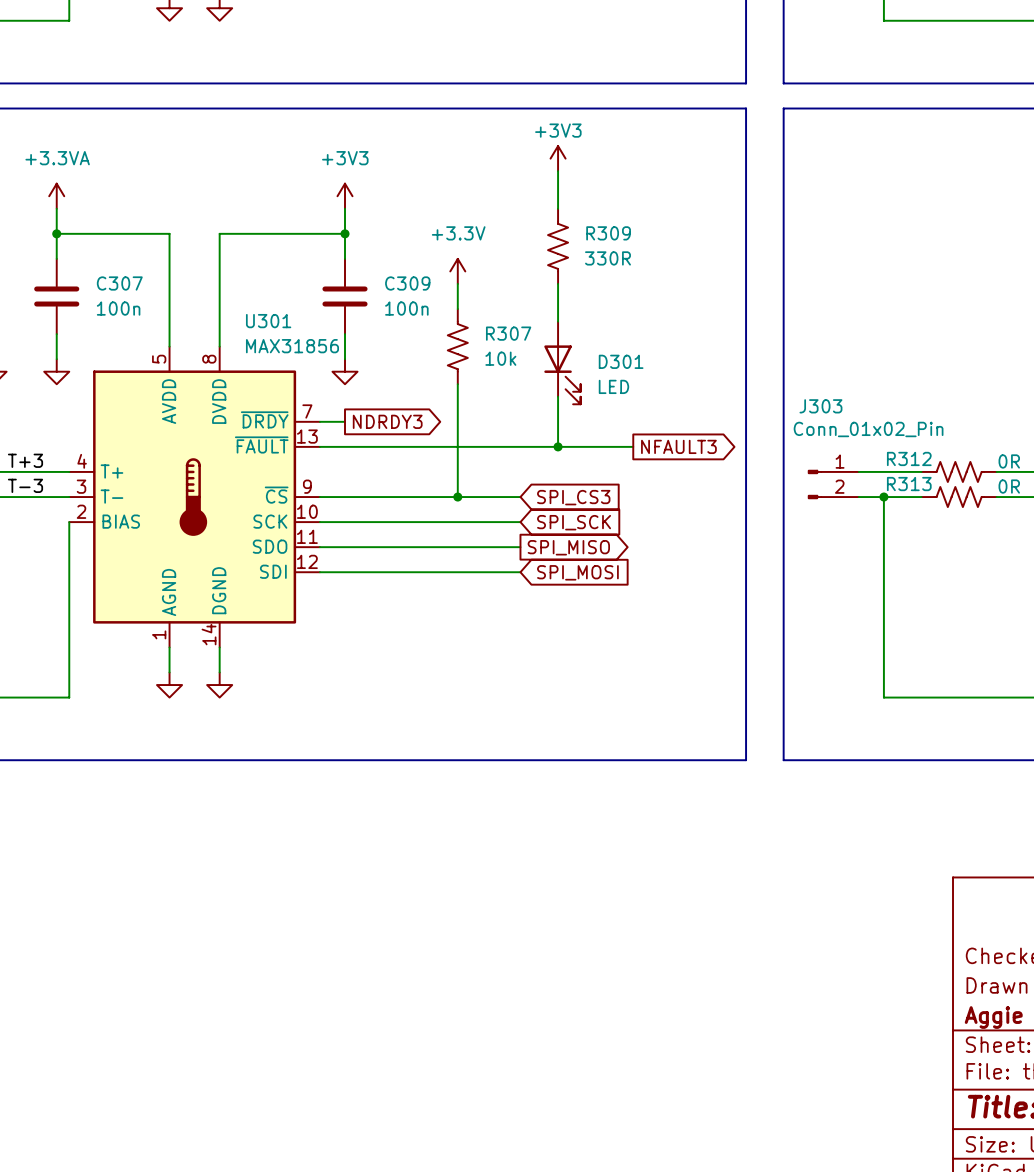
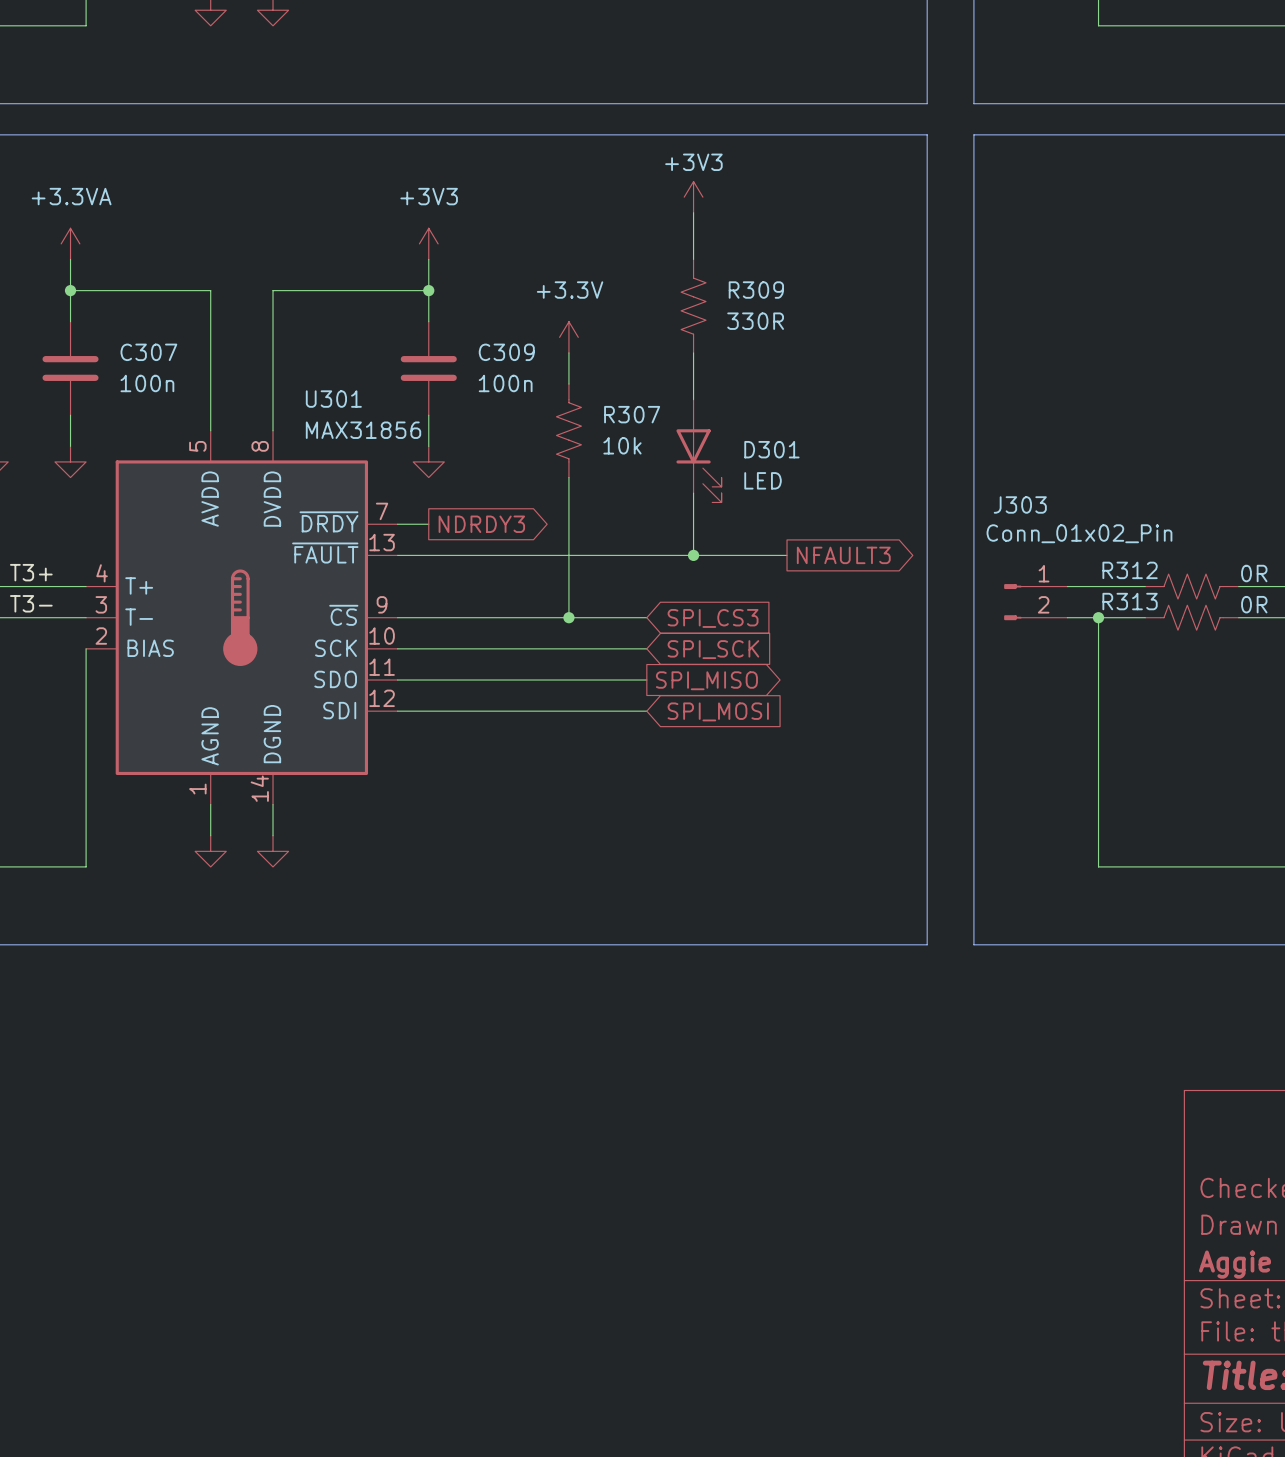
label: T+3 (25, 460) -> T3+ (31, 572)
label: T-3 (25, 485) -> T3- (31, 603)

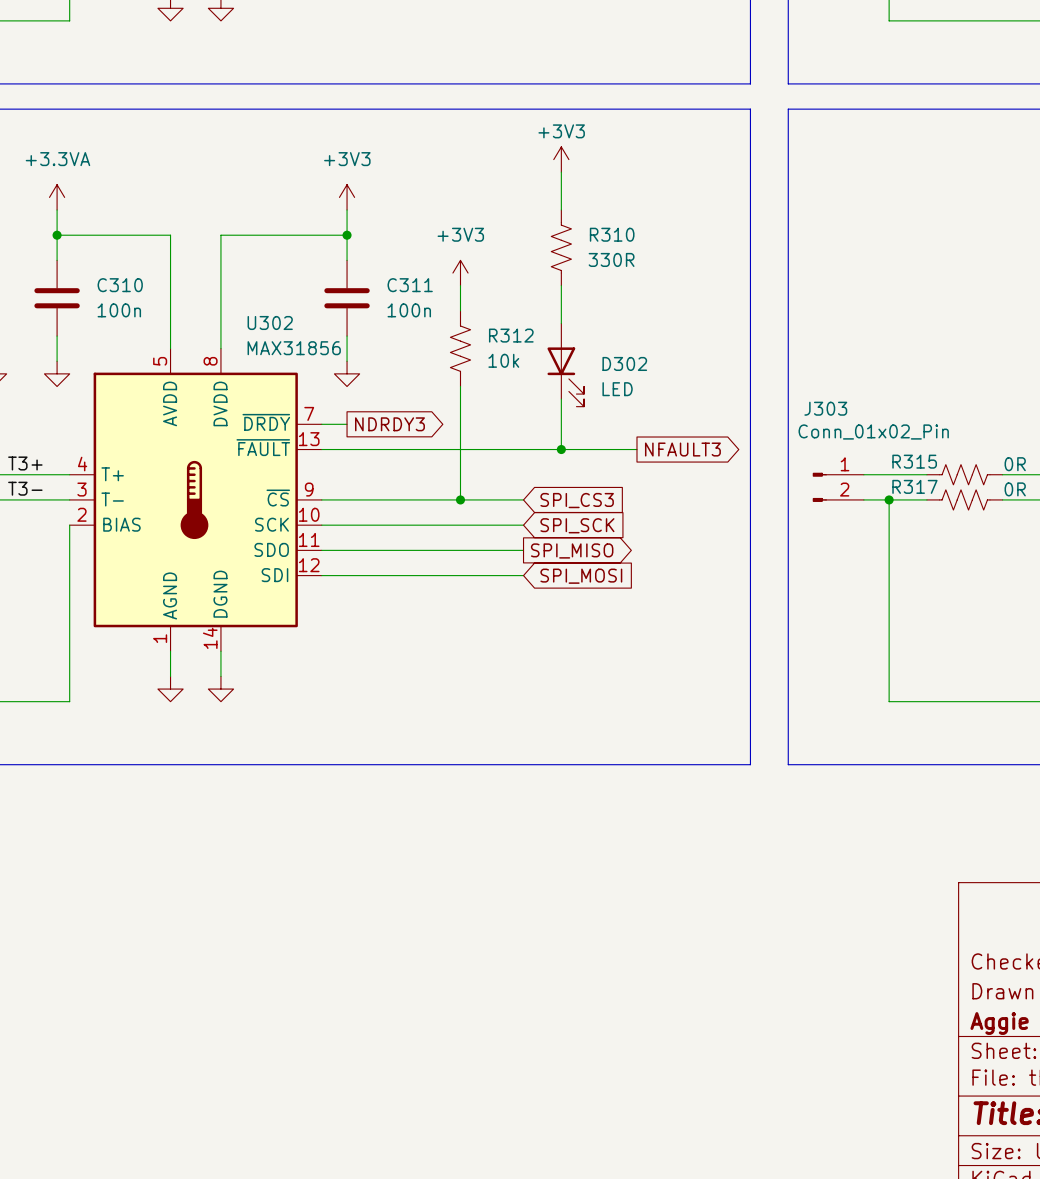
R309 name: R309 (756, 290) -> R310 (612, 234)
power symbol: +3.3V (568, 337) -> +3V3 (460, 273)
C307 name: C307 (148, 352) -> C310 (120, 285)
C309 name: C309 (506, 352) -> C311 (410, 285)
U301 name: U301 (333, 399) -> U302 (270, 322)
R307 name: R307 (632, 414) -> R312 (511, 335)
D301 name: D301 (771, 449) -> D302 (624, 363)
R312 name: R312 (1130, 570) -> R315 (914, 461)
R313 name: R313 (1130, 601) -> R317 (914, 486)

